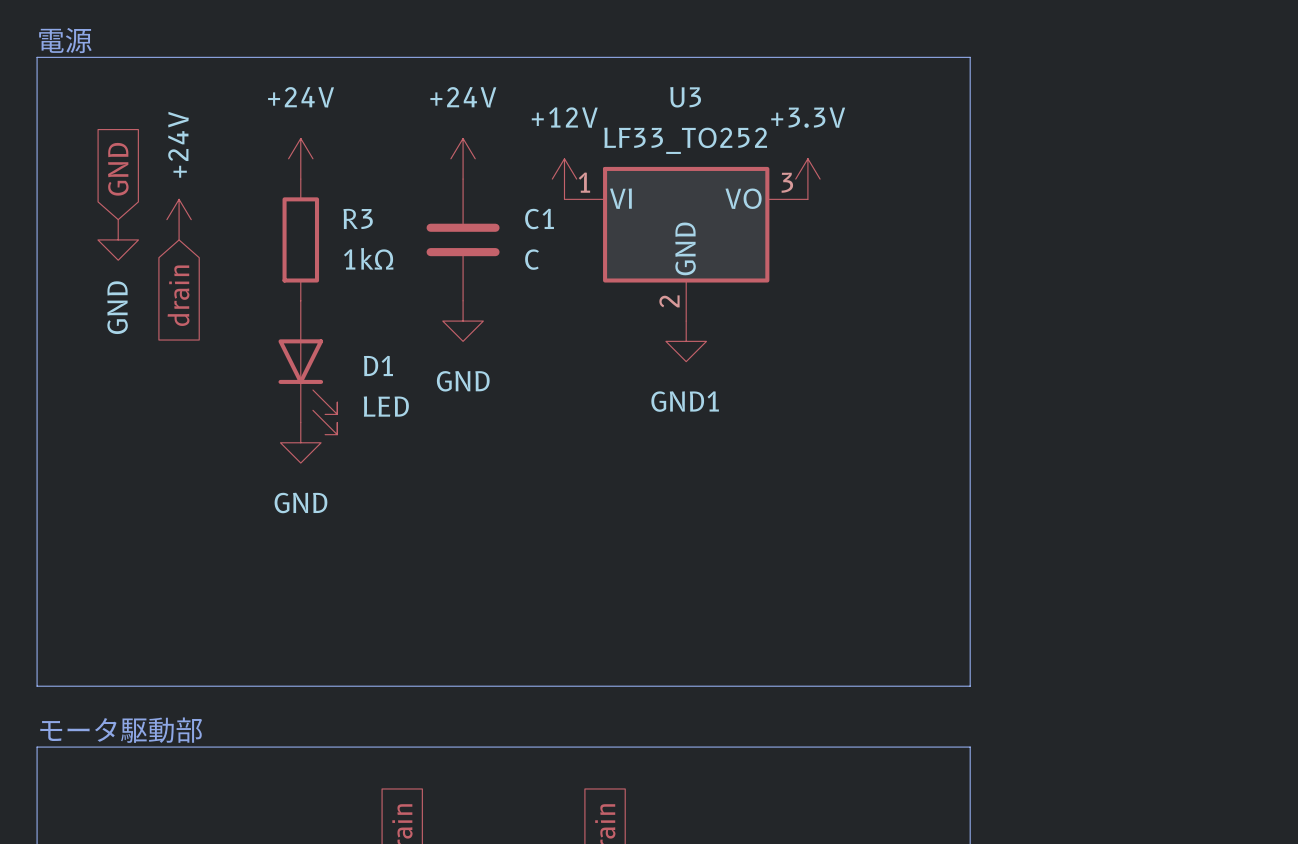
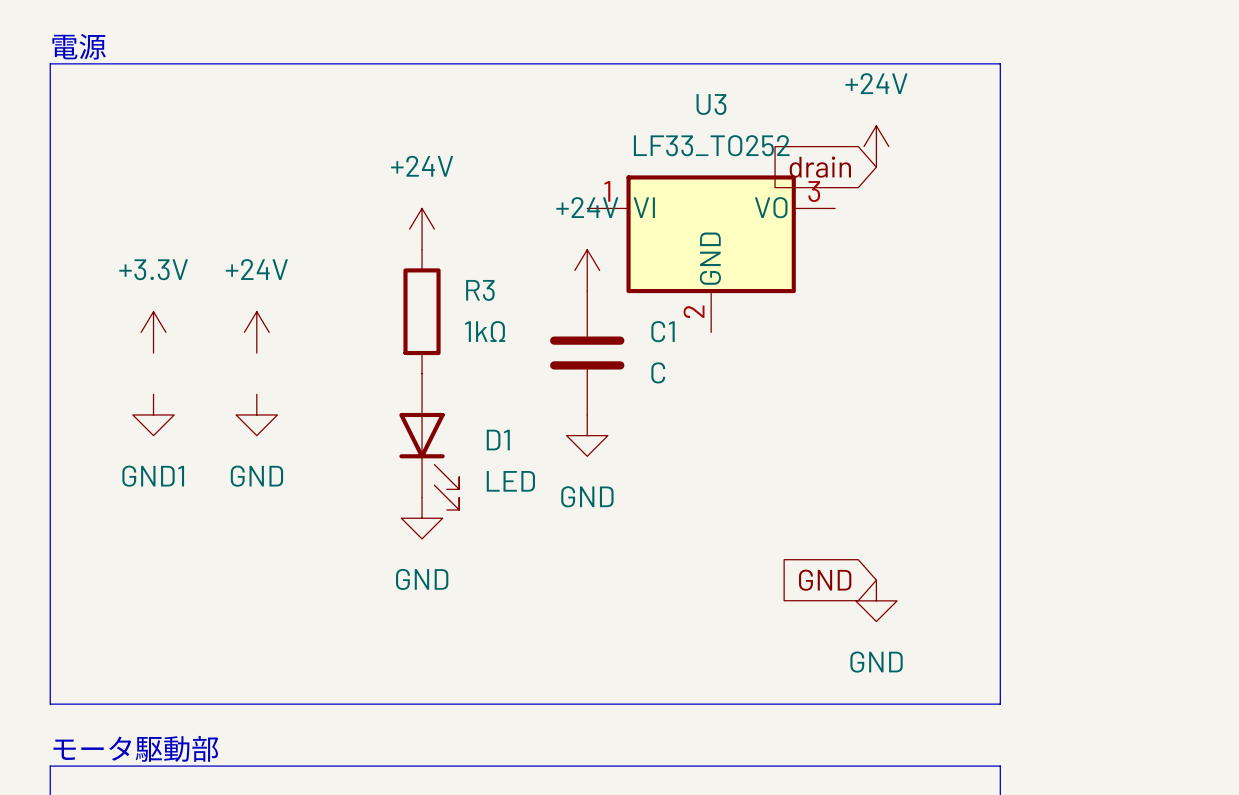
power symbol: none -> +24V (876, 146)
power symbol: +24V (300, 158) -> none
power symbol: +24V (463, 158) -> none
global label: none -> drain (820, 167)
global label: GND (118, 169) -> none
power symbol: +12V (564, 179) -> none
power symbol: +3.3V (807, 179) -> none
power symbol: +24V (179, 219) -> none
power symbol: none -> +24V (422, 229)
power symbol: GND (118, 239) -> none
R3 position: (300, 239) -> (422, 311)
C1 position: (463, 239) -> (587, 353)
power symbol: none -> +24V (587, 270)
global label: drain (178, 295) -> none
power symbol: none -> +3.3V (153, 332)
power symbol: none -> +24V (256, 332)
power symbol: GND (463, 321) -> none
power symbol: GND1 (686, 341) -> none
D1 position: (307, 367) -> (429, 441)
power symbol: none -> GND1 (153, 414)
power symbol: none -> GND (256, 414)
power symbol: none -> GND (587, 435)
power symbol: GND (300, 442) -> none
power symbol: none -> GND (422, 518)
global label: none -> GND (825, 580)
power symbol: none -> GND (876, 600)

